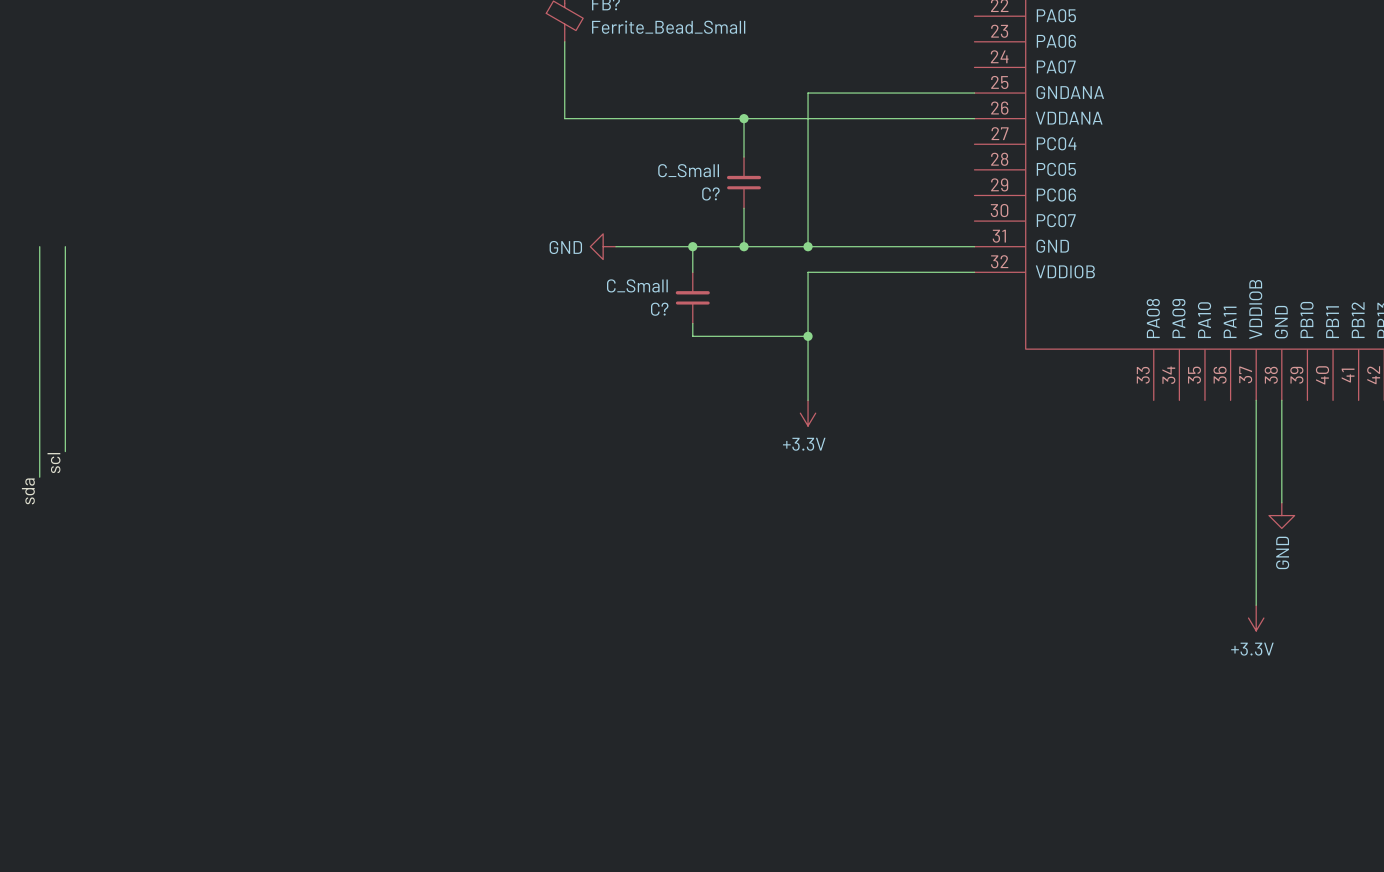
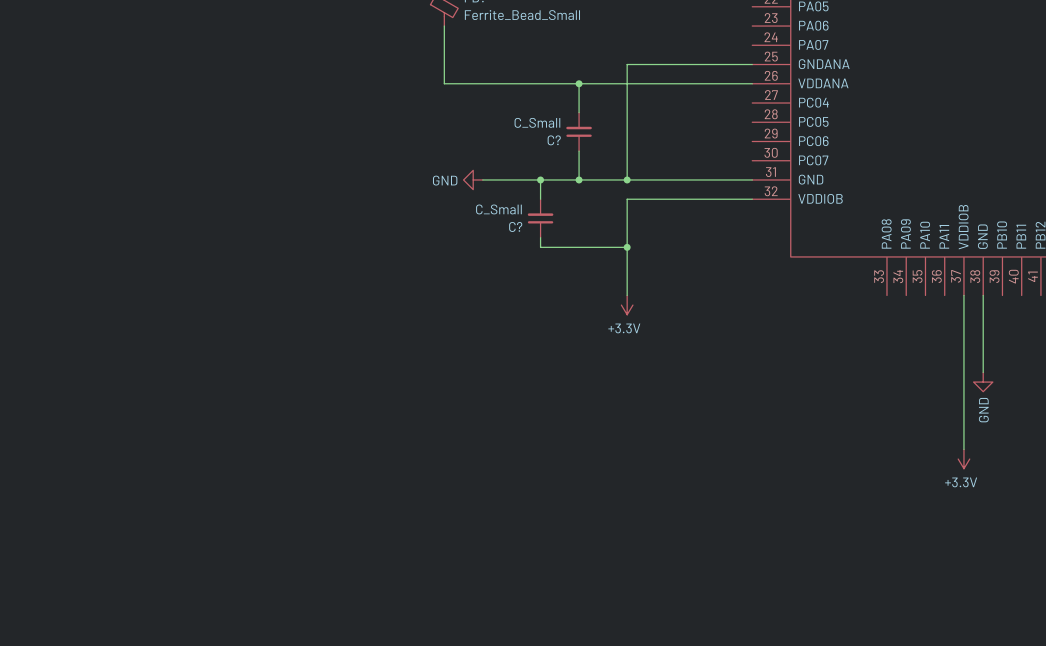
wire: (39, 246) (39, 477) -> none
wire: (65, 246) (65, 451) -> none
label: scl (53, 463) -> none
label: sda (28, 491) -> none

